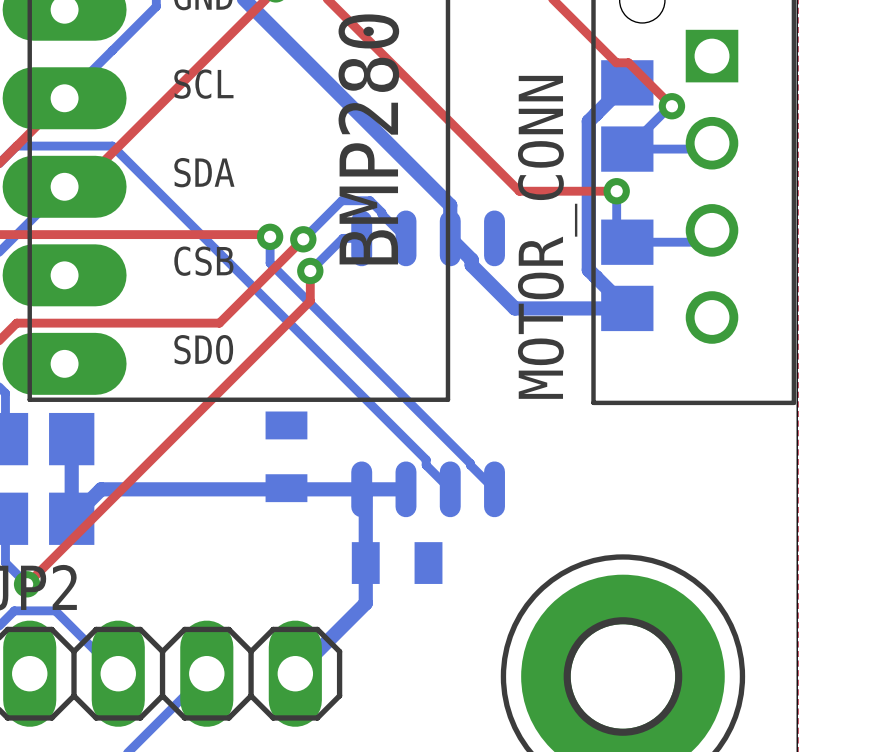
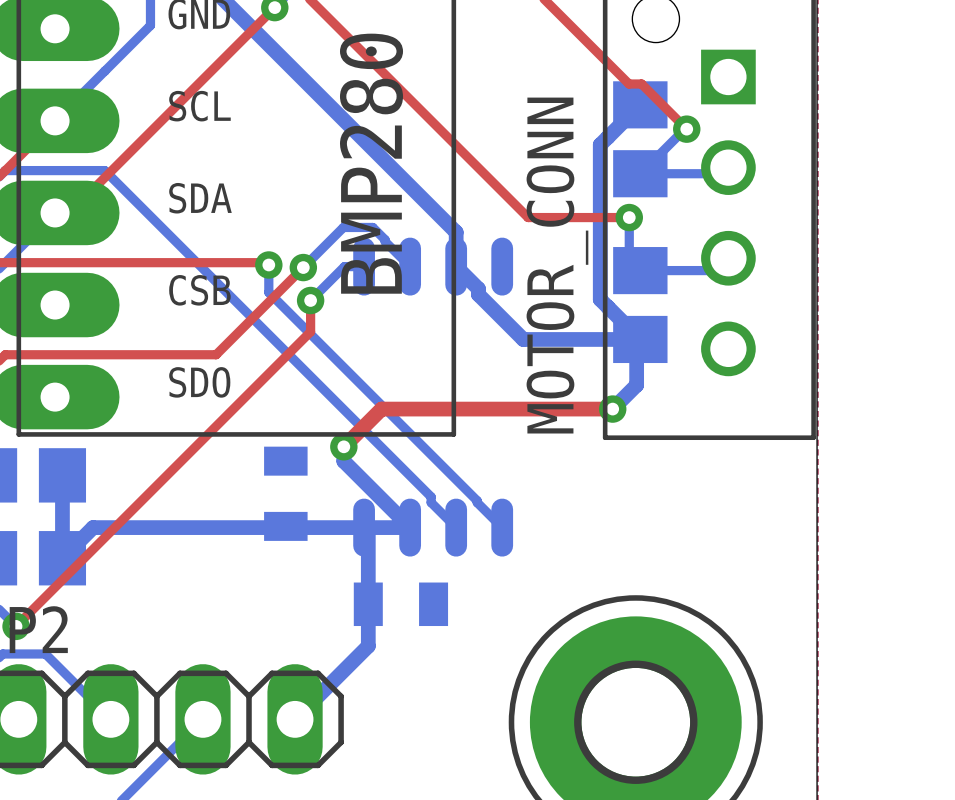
bottom track: none -> (636, 339) (636, 385) (612, 409)
top track: none -> (612, 409) (381, 409) (343, 446)
via: none -> (612, 409)
bottom track: none -> (343, 446) (343, 461) (410, 527)
via: none -> (343, 446)

